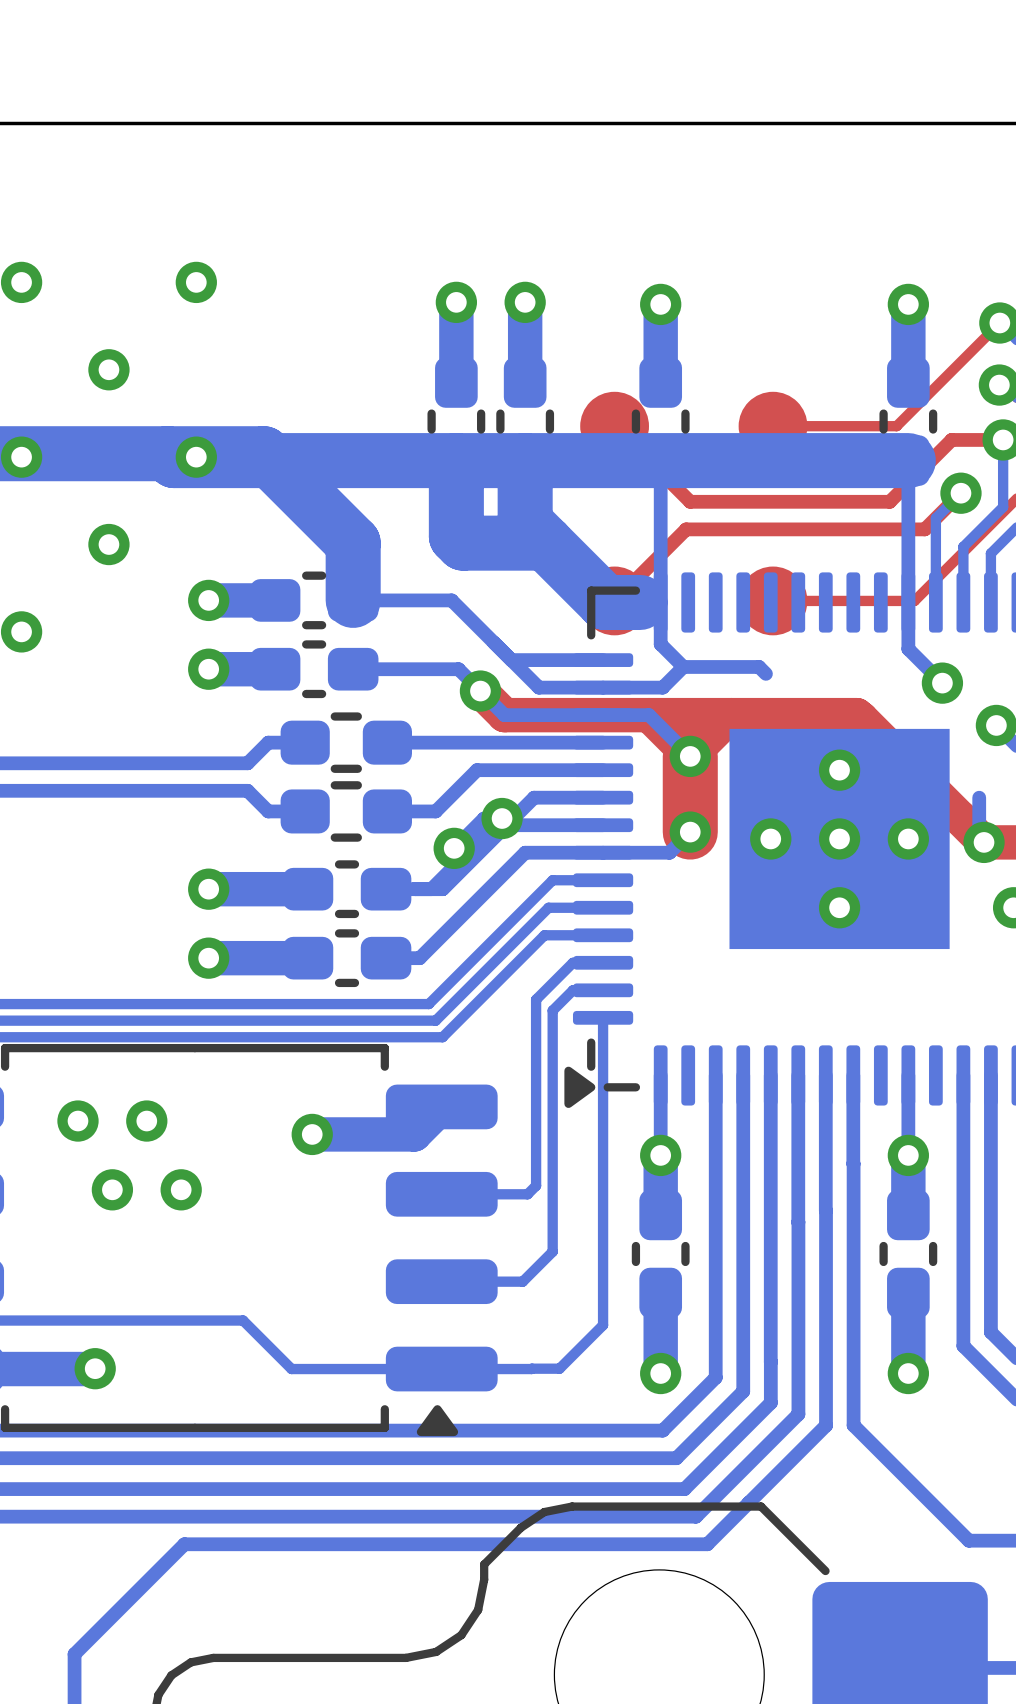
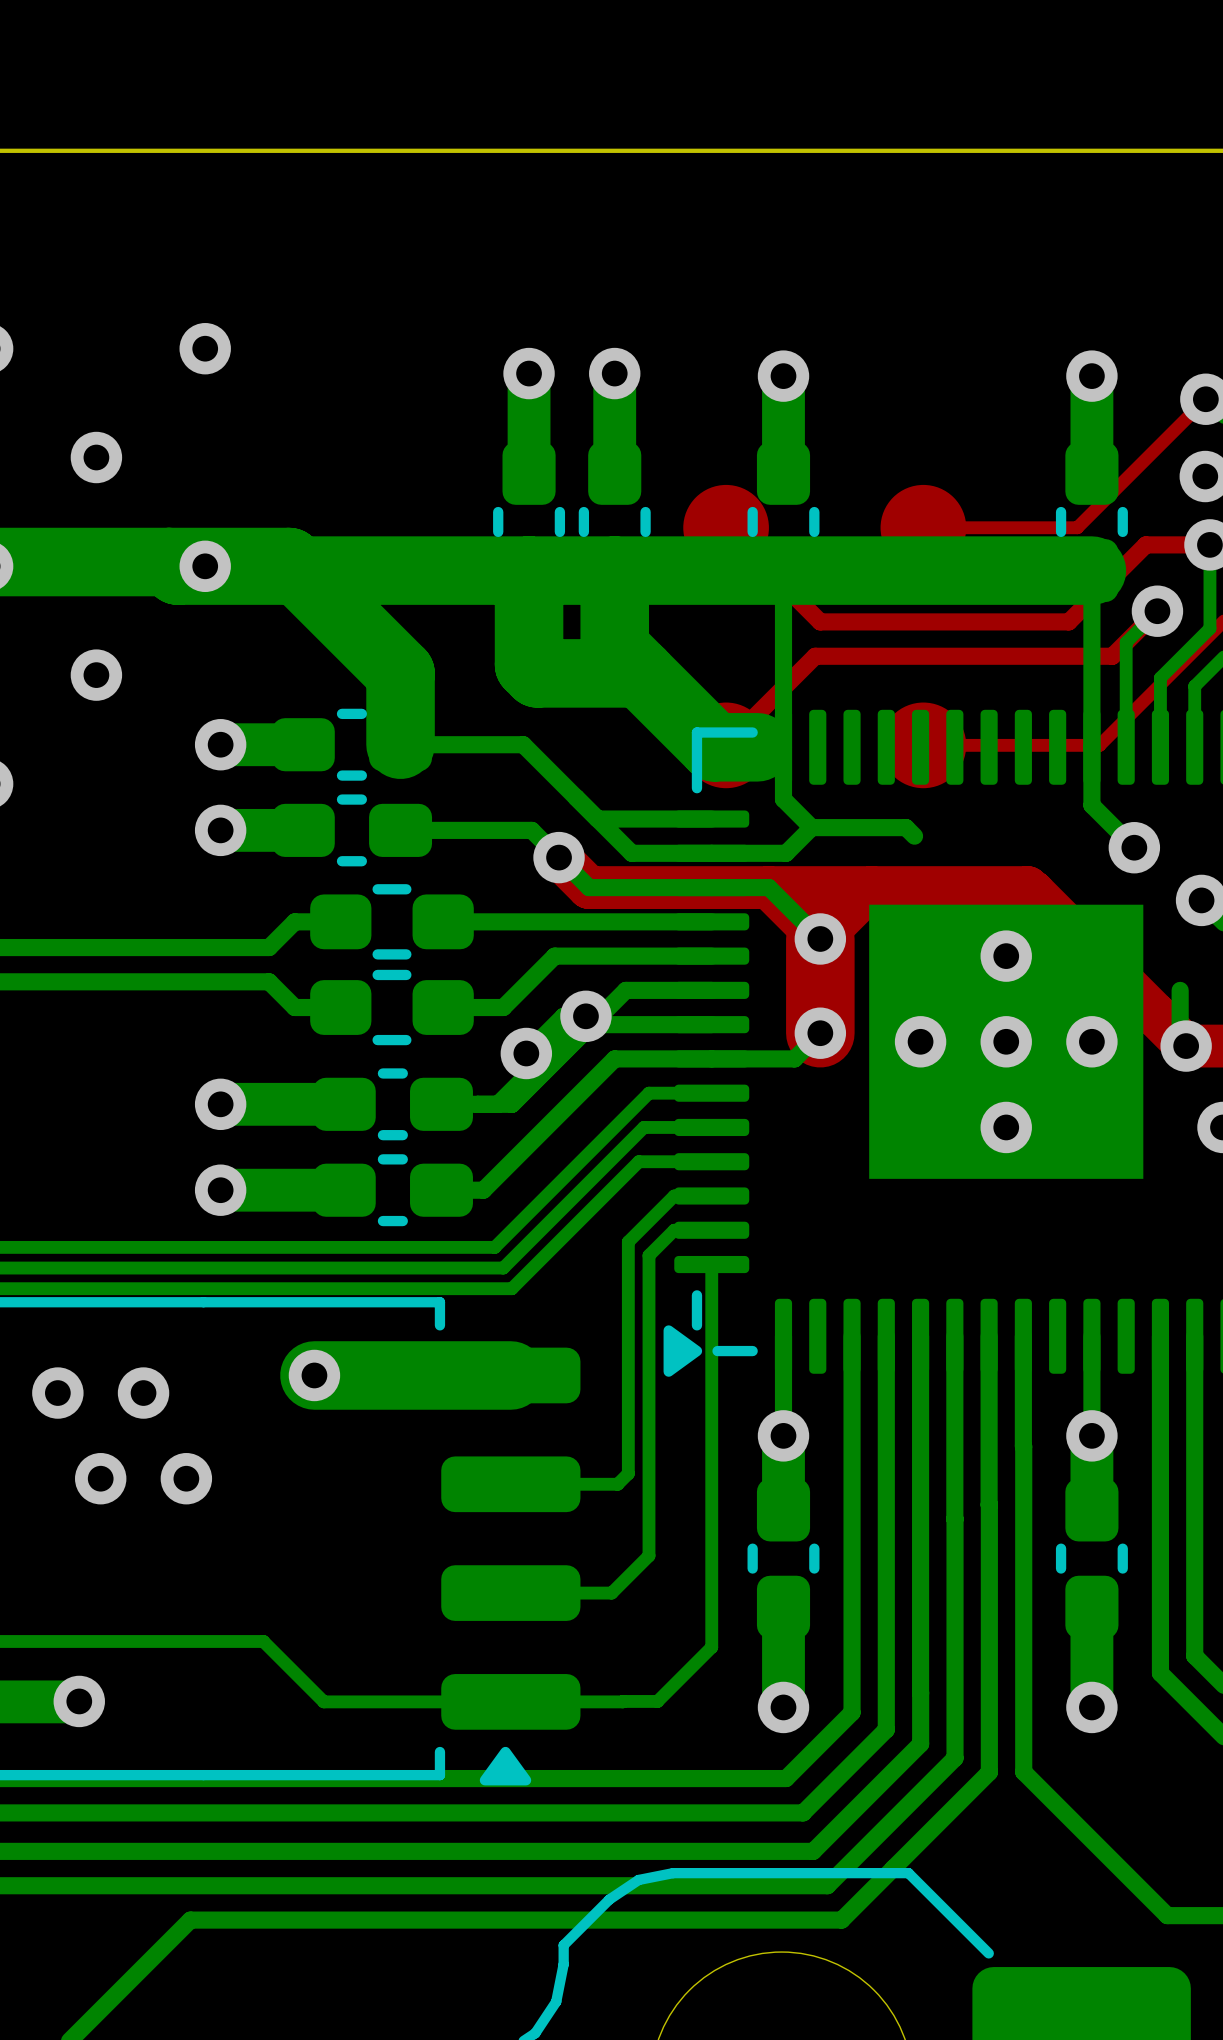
bottom track: (441, 1106) (414, 1134) (312, 1134) -> (510, 1375) (314, 1375)
via position: (312, 1134) -> (314, 1375)

